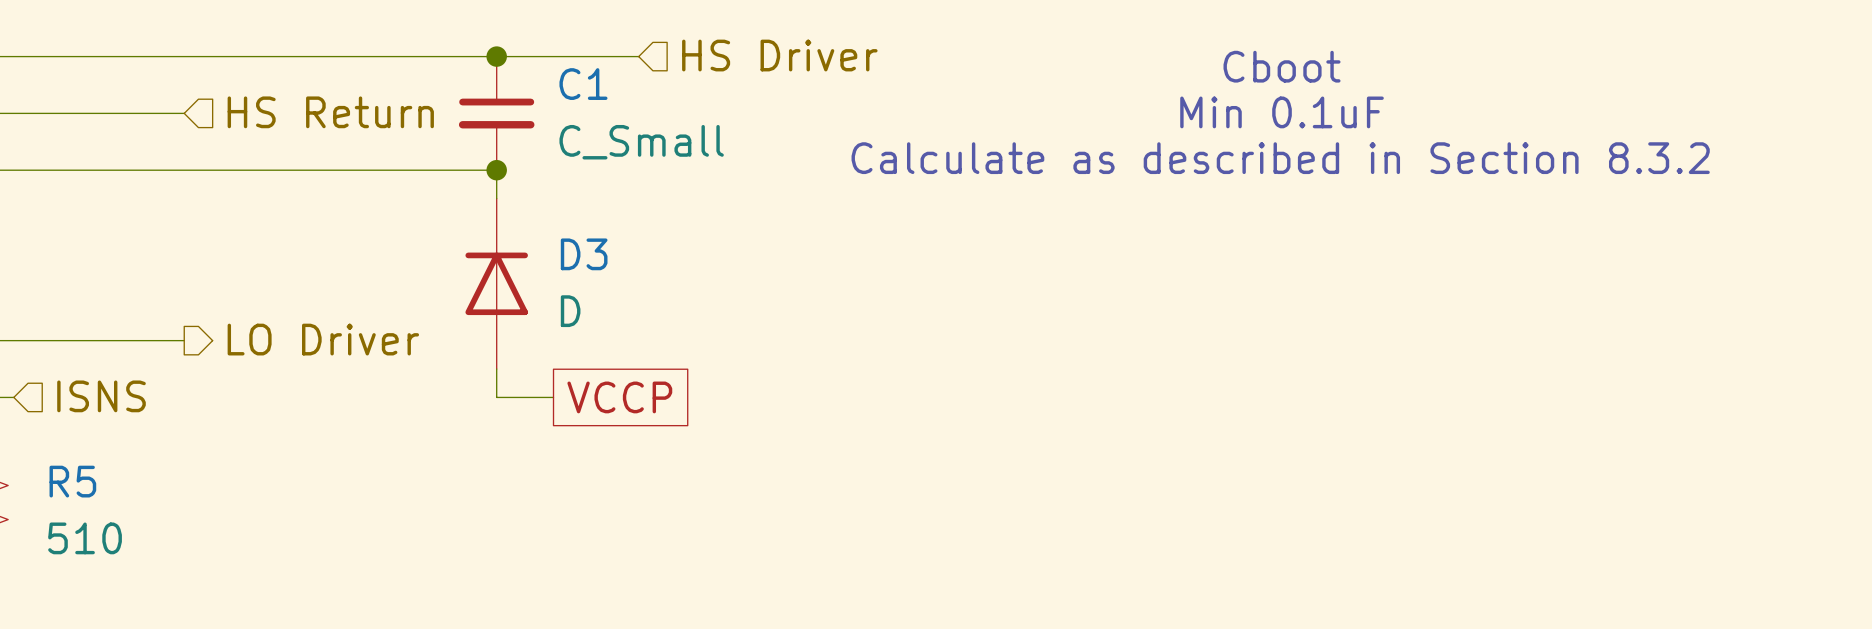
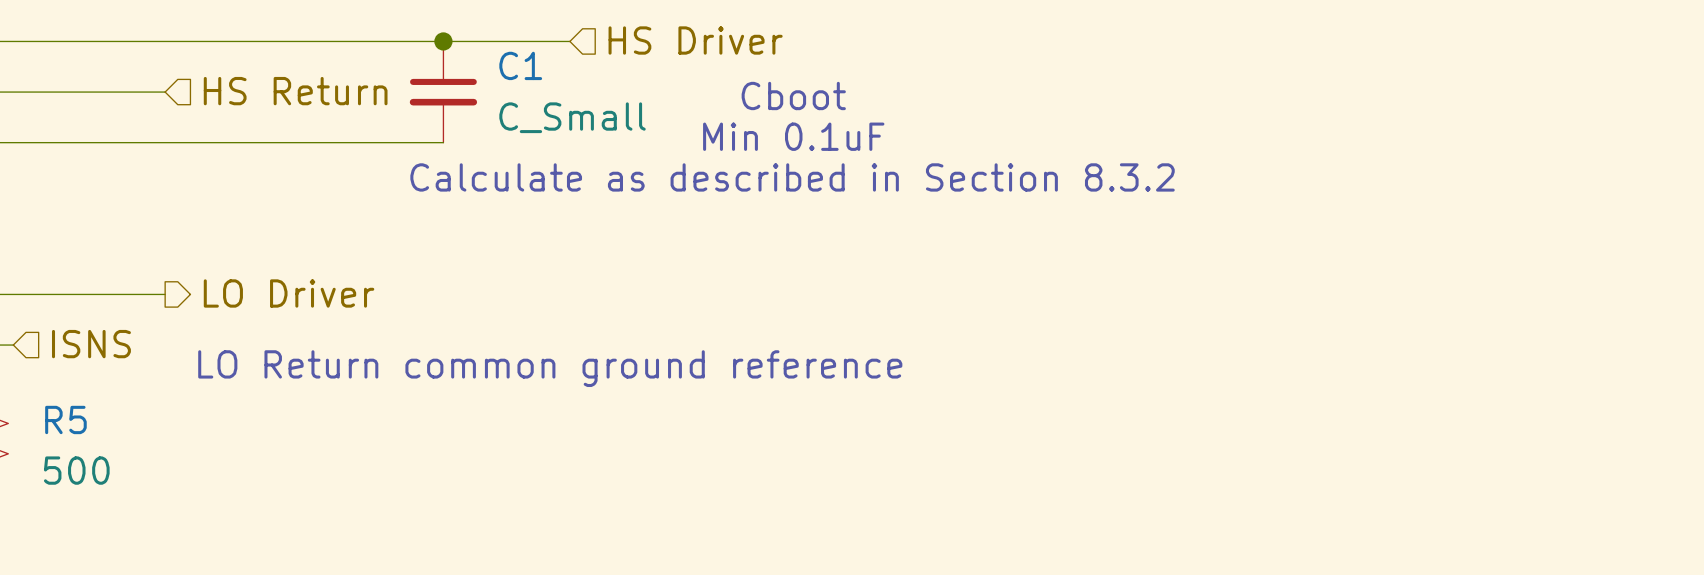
text position: Cboot (1282, 66) -> Cboot (793, 95)
text position: Min 0.1uF (1282, 112) -> Min 0.1uF (793, 136)
text position: Calculate as described in Section 8.3.2 (1280, 158) -> Calculate as described in Section 8.3.2 (792, 177)
wire: (496, 170) (496, 198) -> none
junction: (496, 170) -> none
D3: D (496, 283) -> none
wire: (496, 369) (496, 397) (553, 397) -> none
global label: VCCP (619, 397) -> none
text: none -> LO Return common ground reference (550, 368)
R5 value: 510 (85, 538) -> 500 (76, 470)

